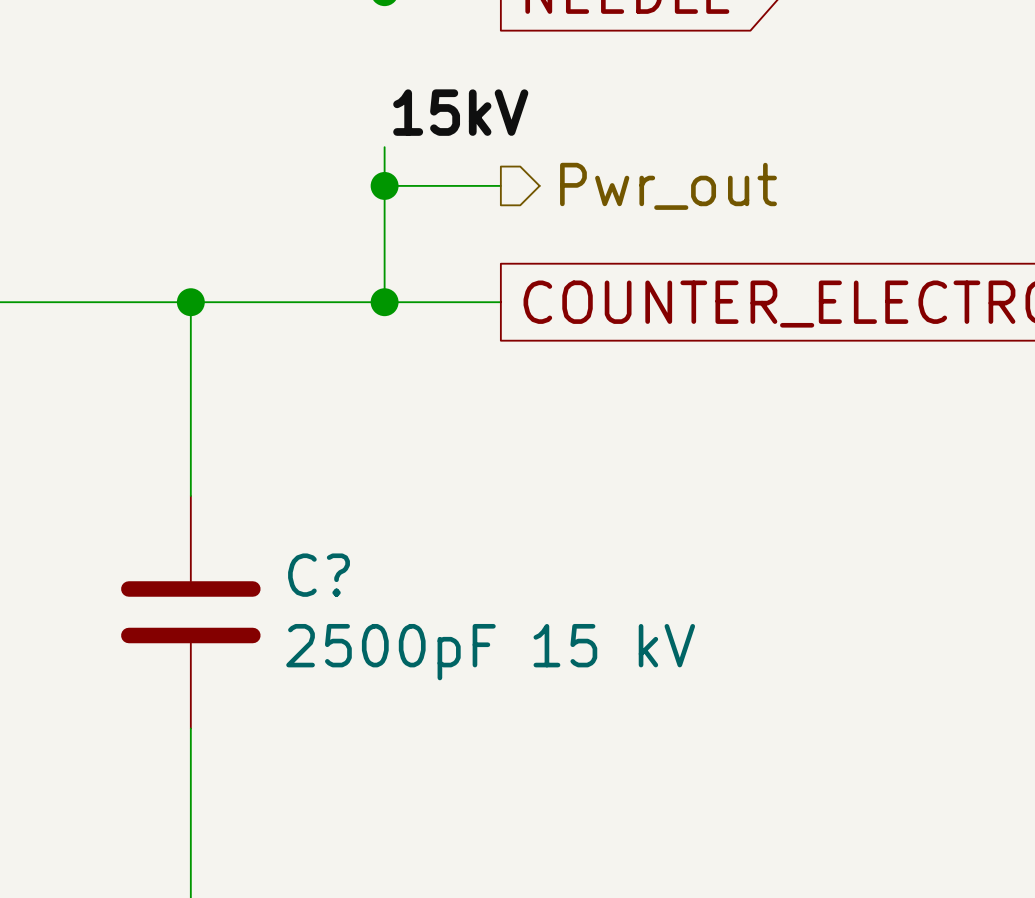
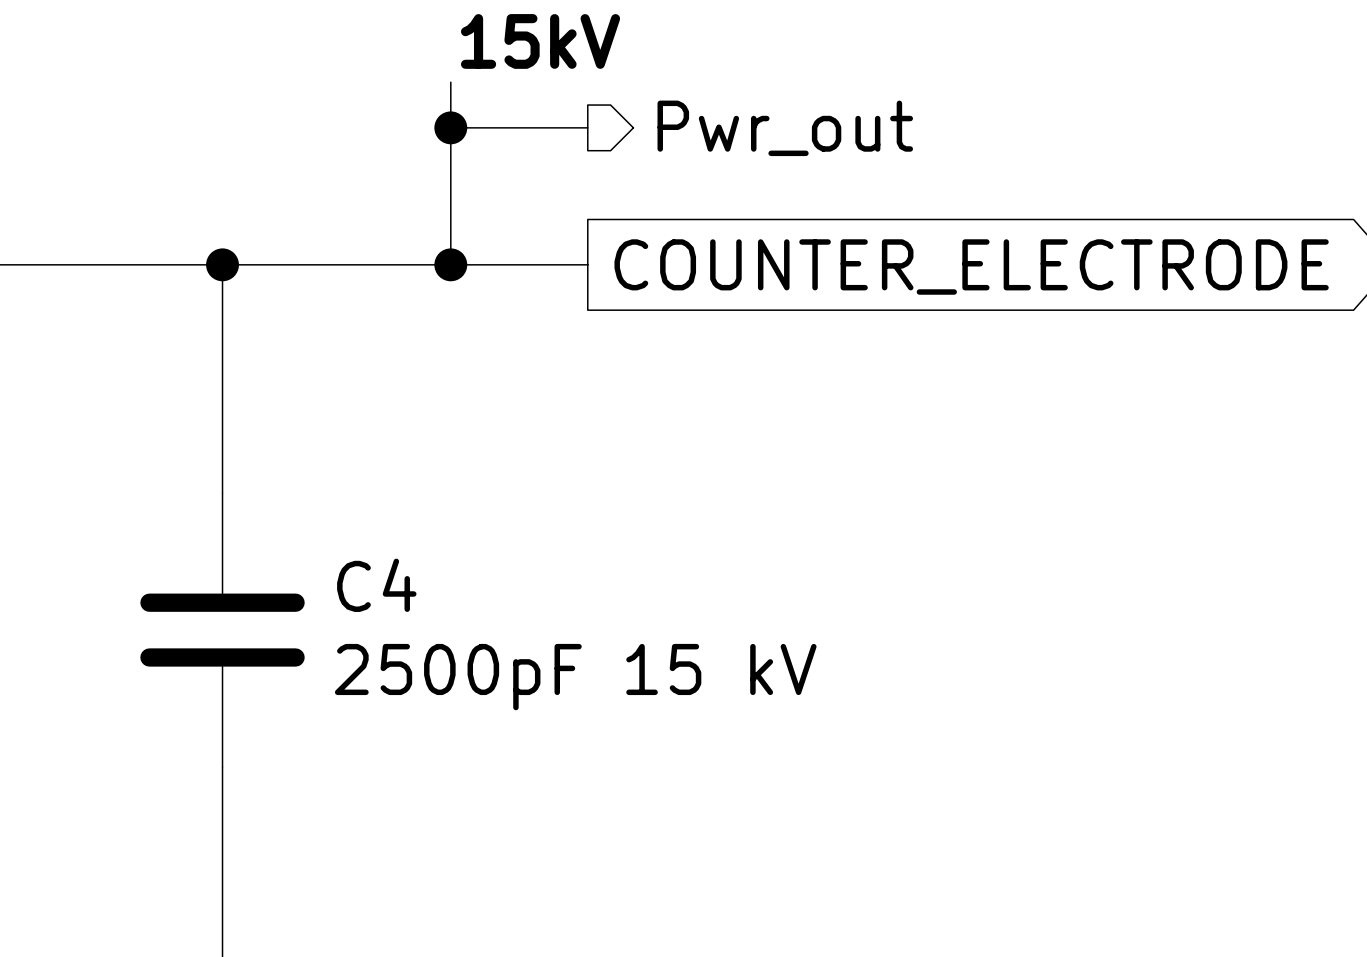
C? name: C? (319, 575) -> C4 (376, 585)

